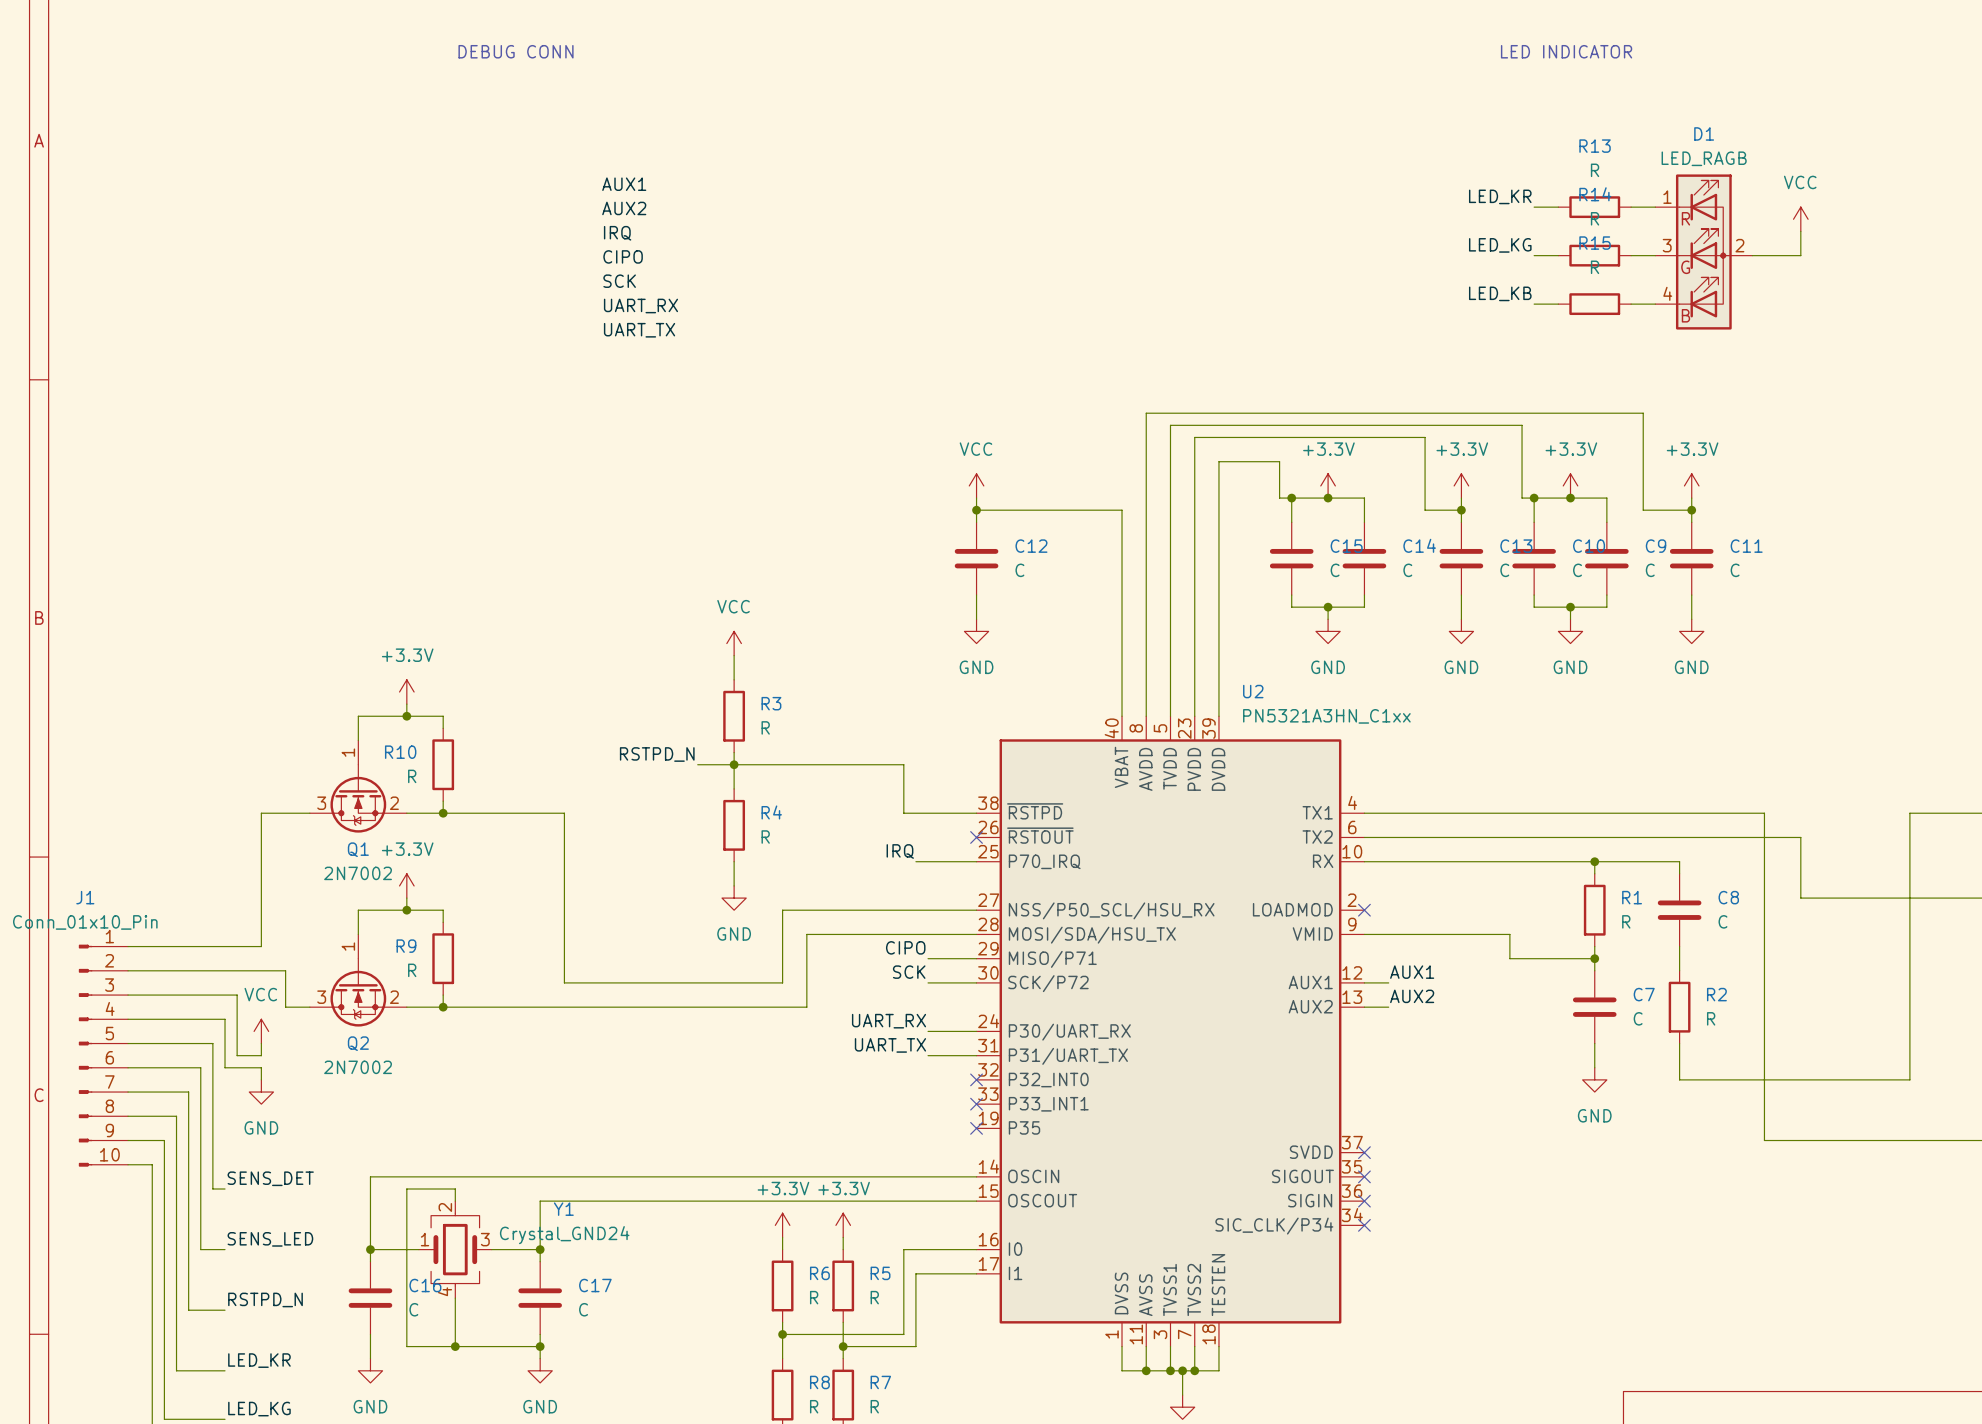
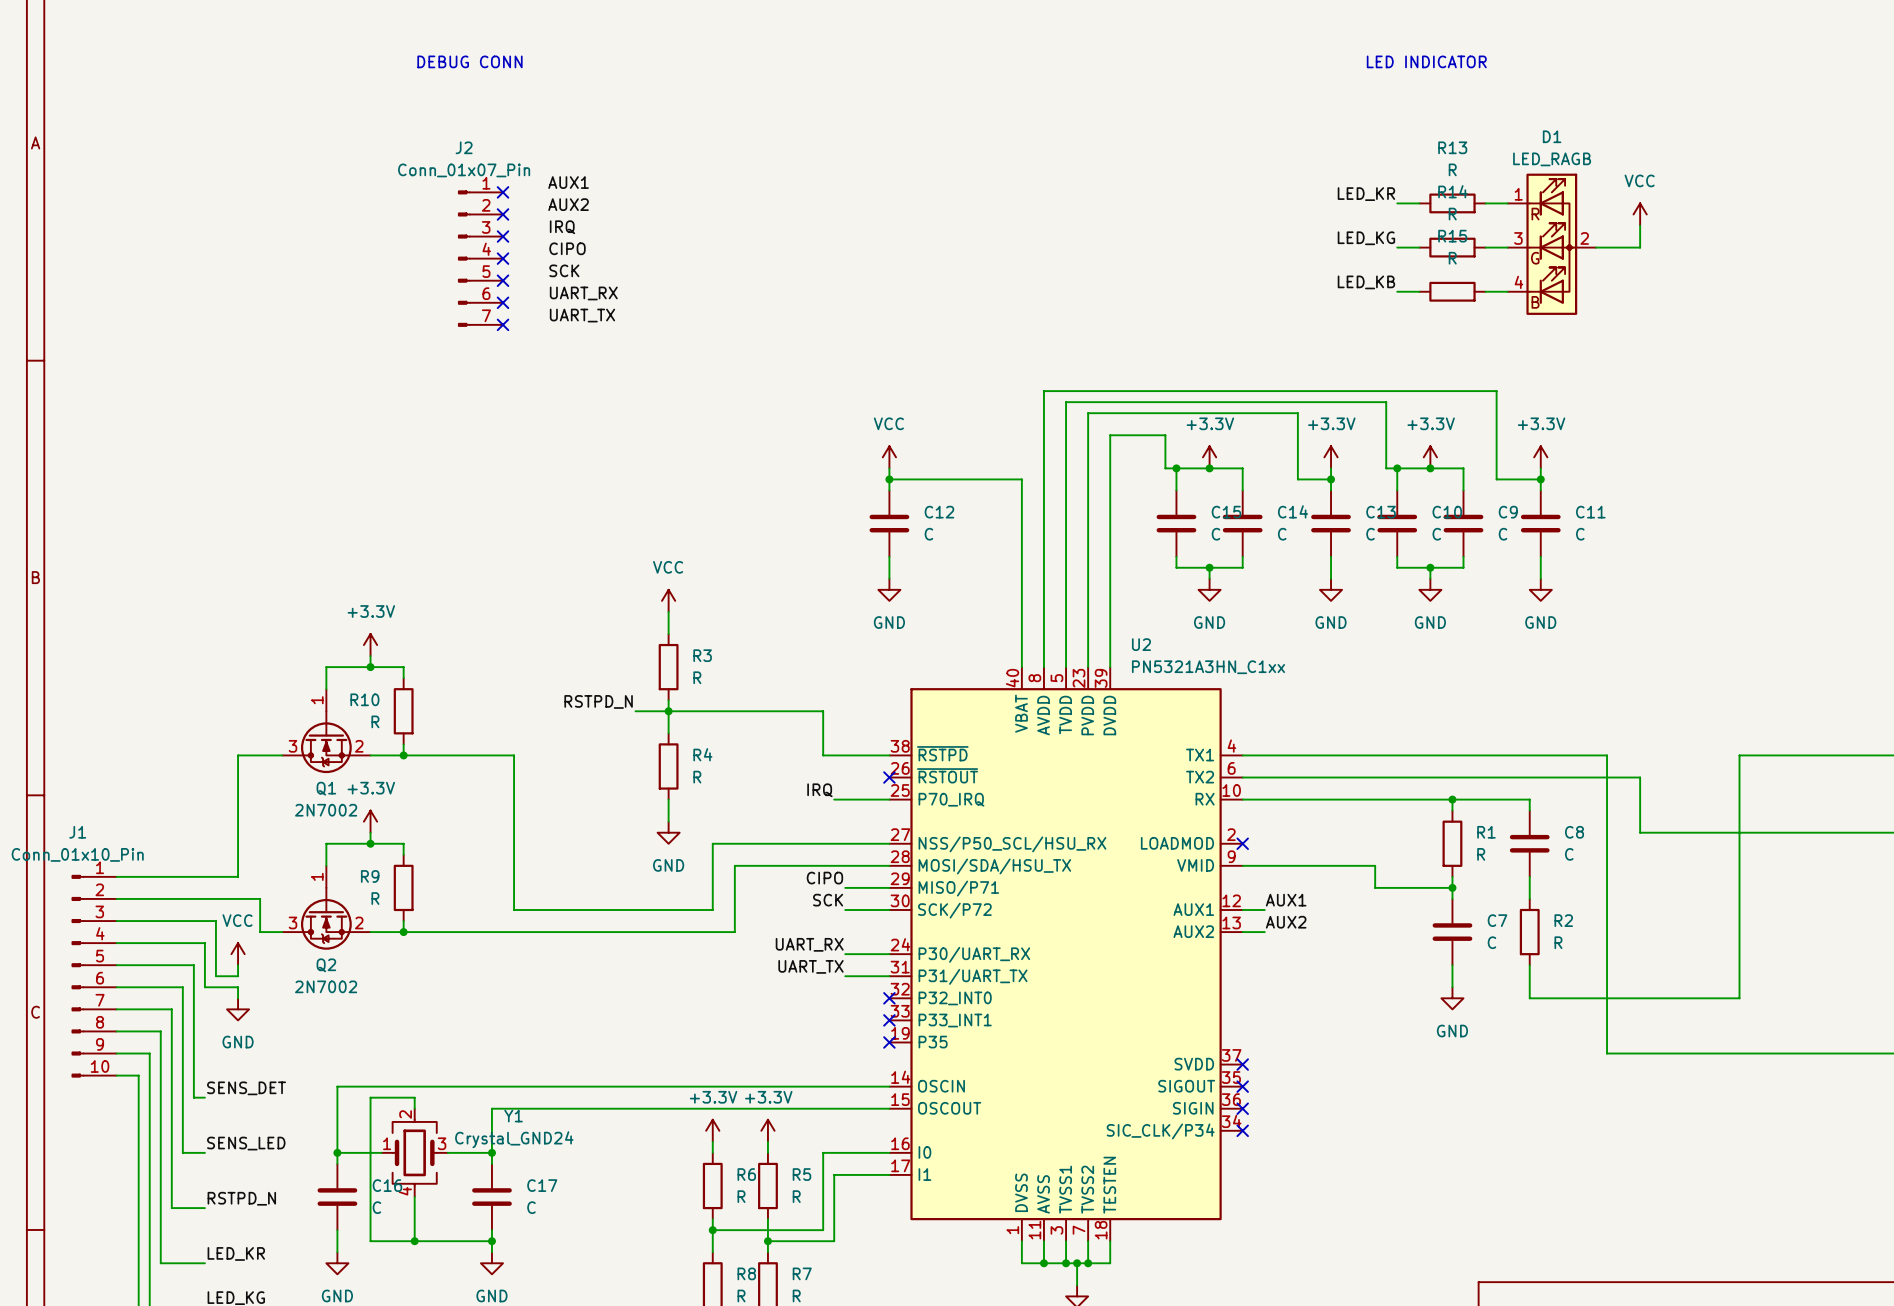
no-connect mark: none -> (503, 192)
no-connect mark: none -> (503, 214)
no-connect mark: none -> (503, 236)
J2: none -> Conn_01x07_Pin (480, 258)
no-connect mark: none -> (503, 258)
no-connect mark: none -> (503, 280)
no-connect mark: none -> (503, 302)
no-connect mark: none -> (503, 324)

